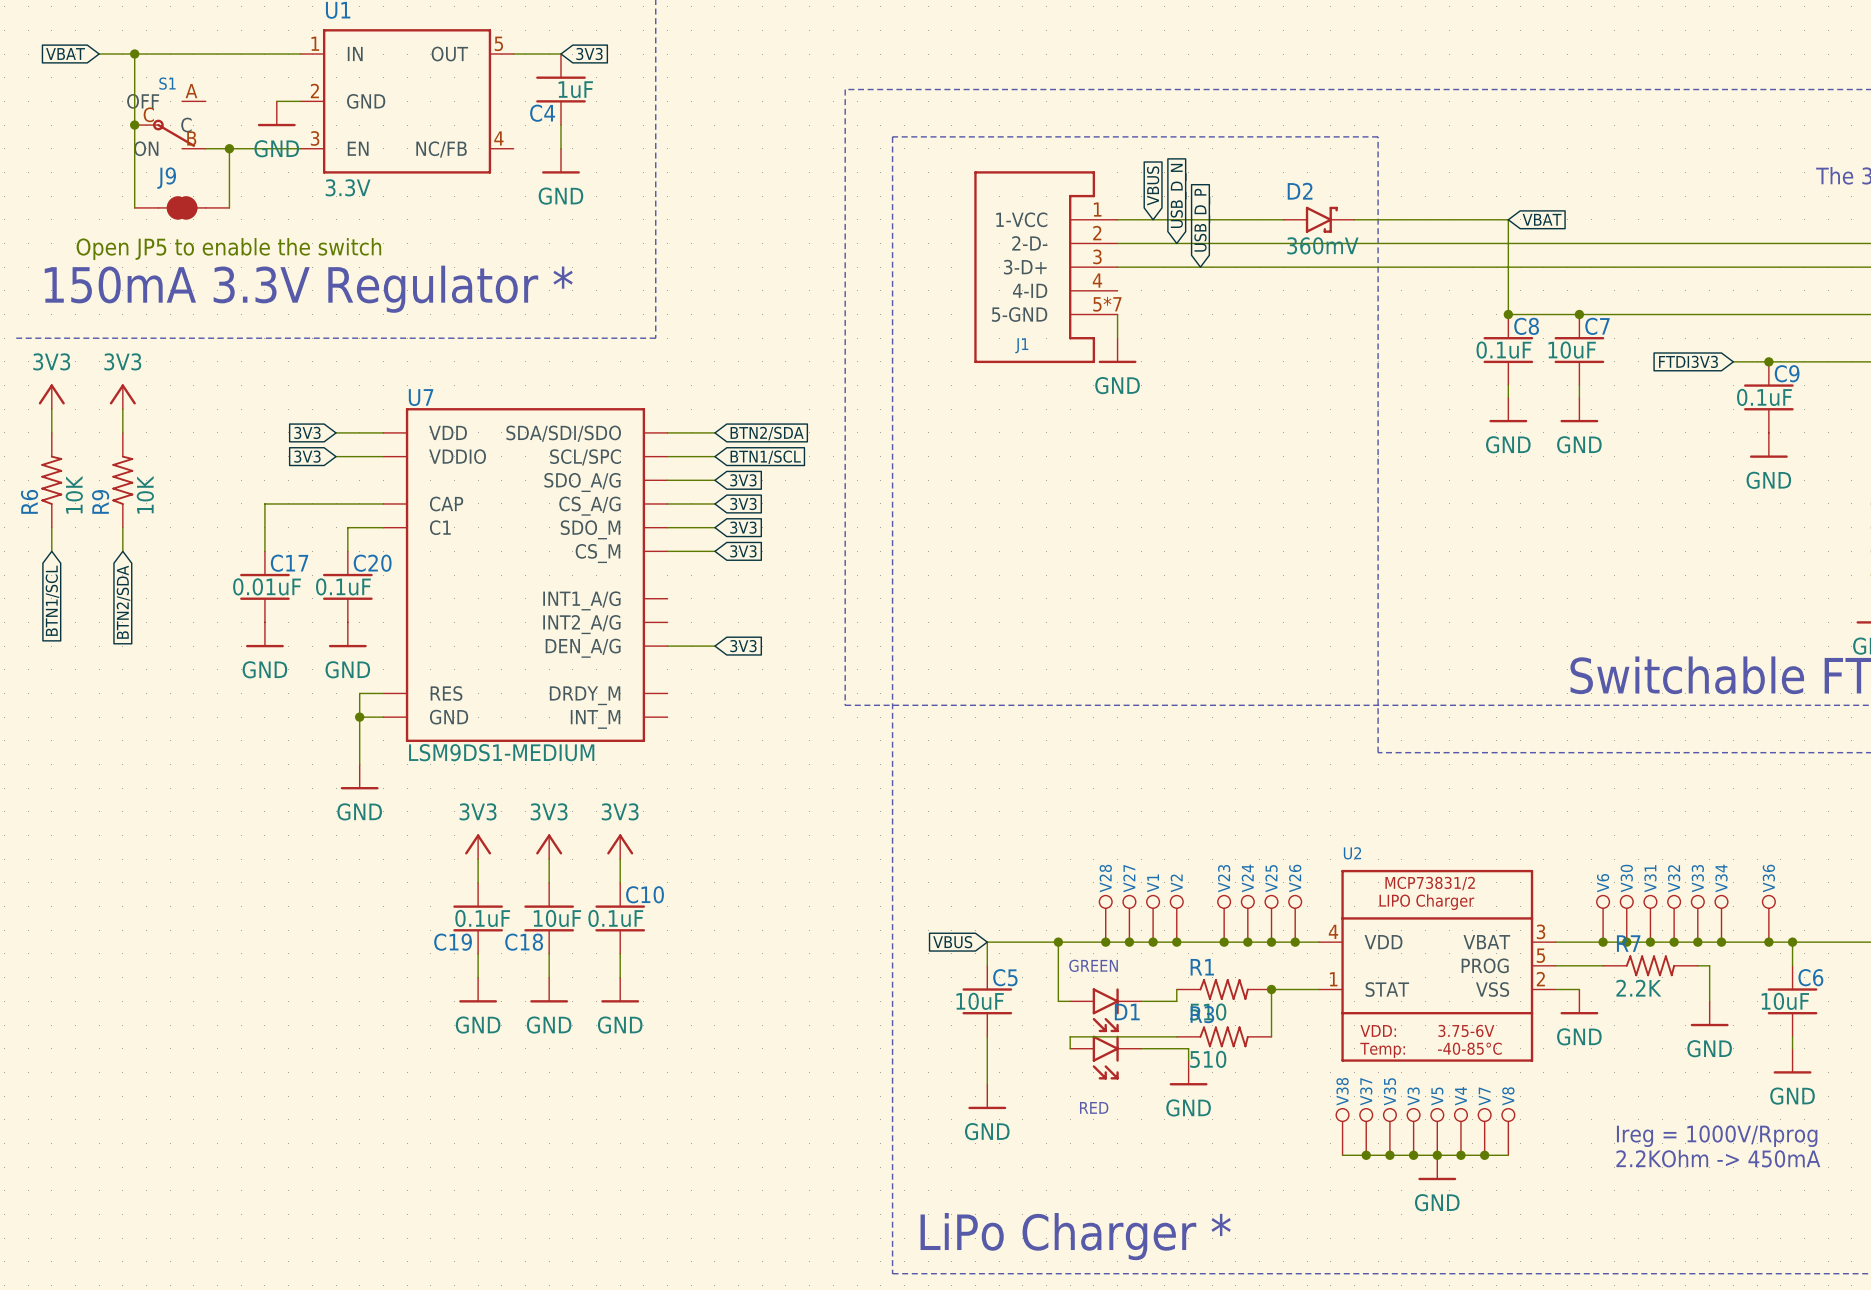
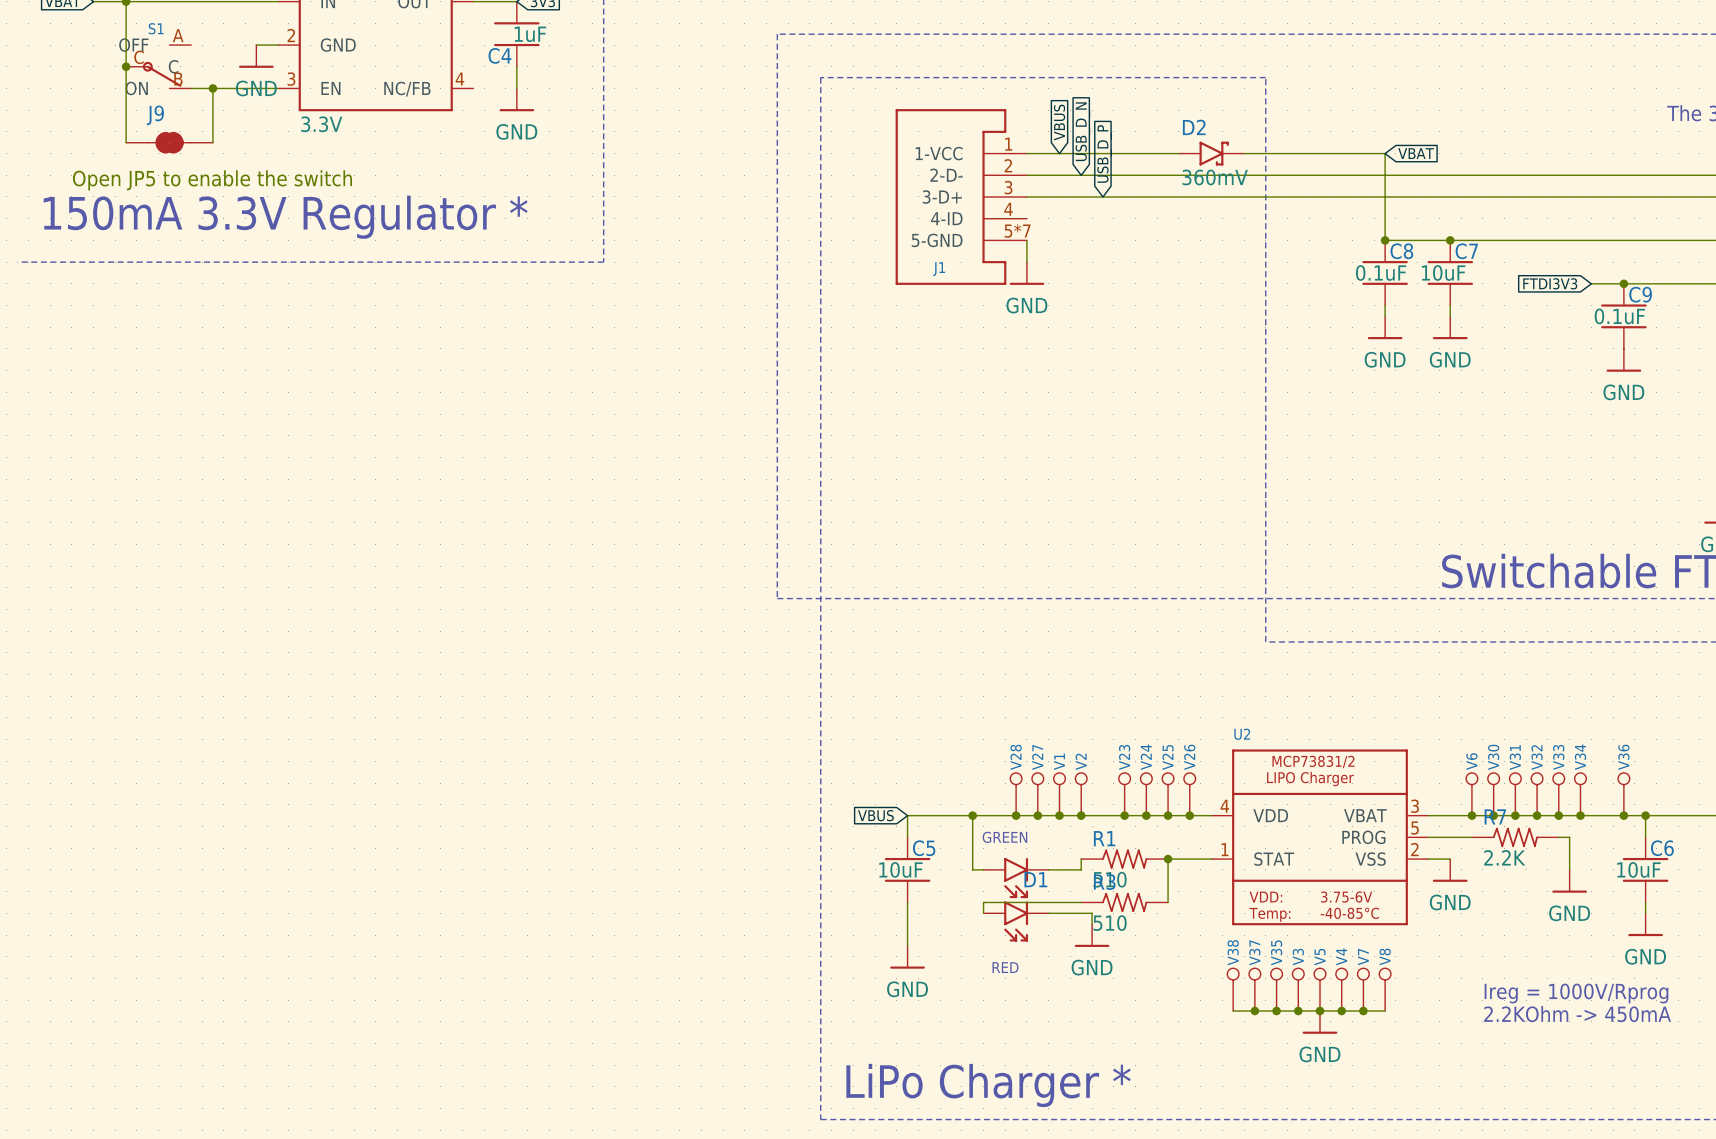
power symbol: 3V3 (51, 396) -> none
power symbol: 3V3 (122, 396) -> none
wire: (51, 409) (51, 432) -> none
wire: (122, 409) (122, 432) -> none
global label: 3V3 (307, 432) -> none
wire: (336, 432) (383, 432) -> none
wire: (667, 432) (714, 432) -> none
global label: BTN2/SDA (767, 433) -> none
global label: 3V3 (307, 456) -> none
wire: (336, 456) (383, 456) -> none
wire: (667, 456) (714, 456) -> none
global label: BTN1/SCL (765, 457) -> none
R6: 10K (51, 480) -> none
R9: 10K (122, 480) -> none
wire: (667, 480) (714, 480) -> none
global label: 3V3 (743, 480) -> none
wire: (383, 503) (264, 503) (264, 551) -> none
wire: (667, 503) (714, 503) -> none
global label: 3V3 (743, 504) -> none
wire: (51, 527) (51, 551) -> none
wire: (122, 527) (122, 551) -> none
wire: (383, 527) (347, 527) (347, 551) -> none
wire: (667, 527) (714, 527) -> none
global label: 3V3 (743, 527) -> none
wire: (667, 551) (714, 551) -> none
global label: 3V3 (743, 551) -> none
U7: LSM9DS1-MEDIUM (525, 575) -> none
C17: 0.01uF (264, 586) -> none
C20: 0.1uF (347, 586) -> none
global label: BTN1/SCL (52, 600) -> none
global label: BTN2/SDA (123, 602) -> none
power symbol: GND (264, 634) -> none
power symbol: GND (347, 634) -> none
wire: (667, 646) (714, 646) -> none
global label: 3V3 (743, 646) -> none
wire: (383, 693) (359, 693) (359, 764) -> none
wire: (359, 717) (383, 717) -> none
junction: (359, 717) -> none
power symbol: GND (359, 776) -> none
power symbol: 3V3 (478, 846) -> none
power symbol: 3V3 (549, 846) -> none
power symbol: 3V3 (620, 846) -> none
wire: (478, 859) (478, 882) -> none
wire: (549, 859) (549, 882) -> none
wire: (620, 859) (620, 882) -> none
C19: 0.1uF (478, 918) -> none
C18: 10uF (549, 918) -> none
C10: 0.1uF (620, 918) -> none
wire: (478, 953) (478, 977) -> none
wire: (549, 953) (549, 977) -> none
wire: (620, 953) (620, 977) -> none
power symbol: GND (478, 990) -> none
power symbol: GND (549, 990) -> none
power symbol: GND (620, 990) -> none

